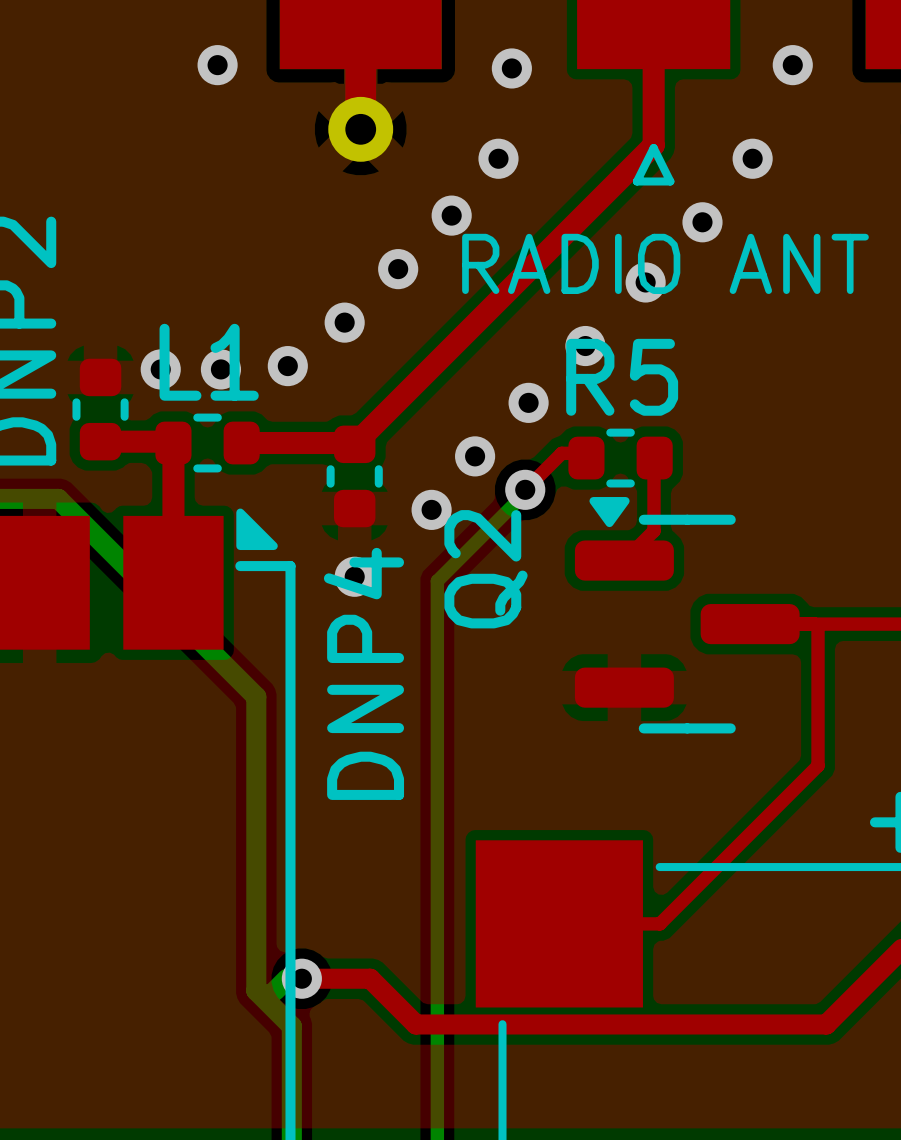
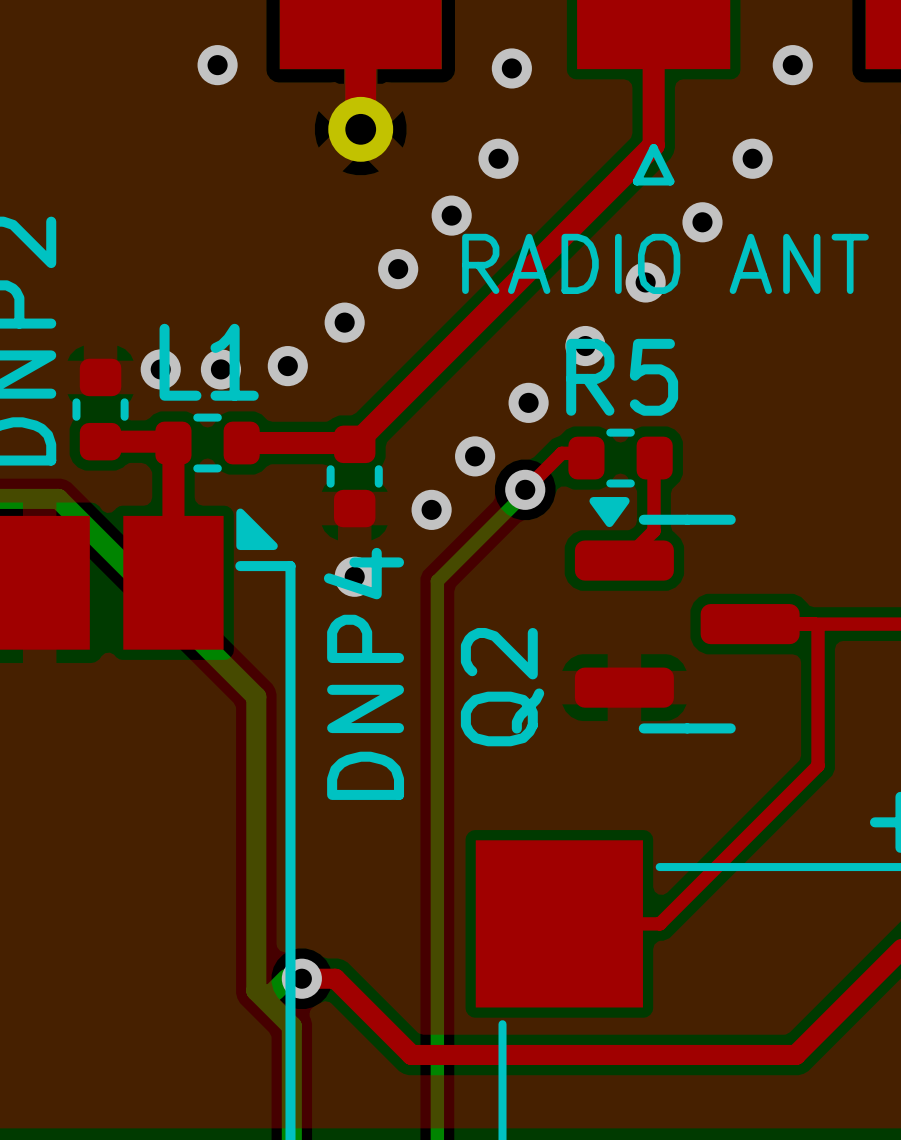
Q2 name position: Q2 (485, 569) -> Q2 (502, 687)
top track: (335, 978) (370, 978) (415, 1024) (826, 1024) -> (335, 978) (411, 1054) (795, 1054) (826, 1024)

